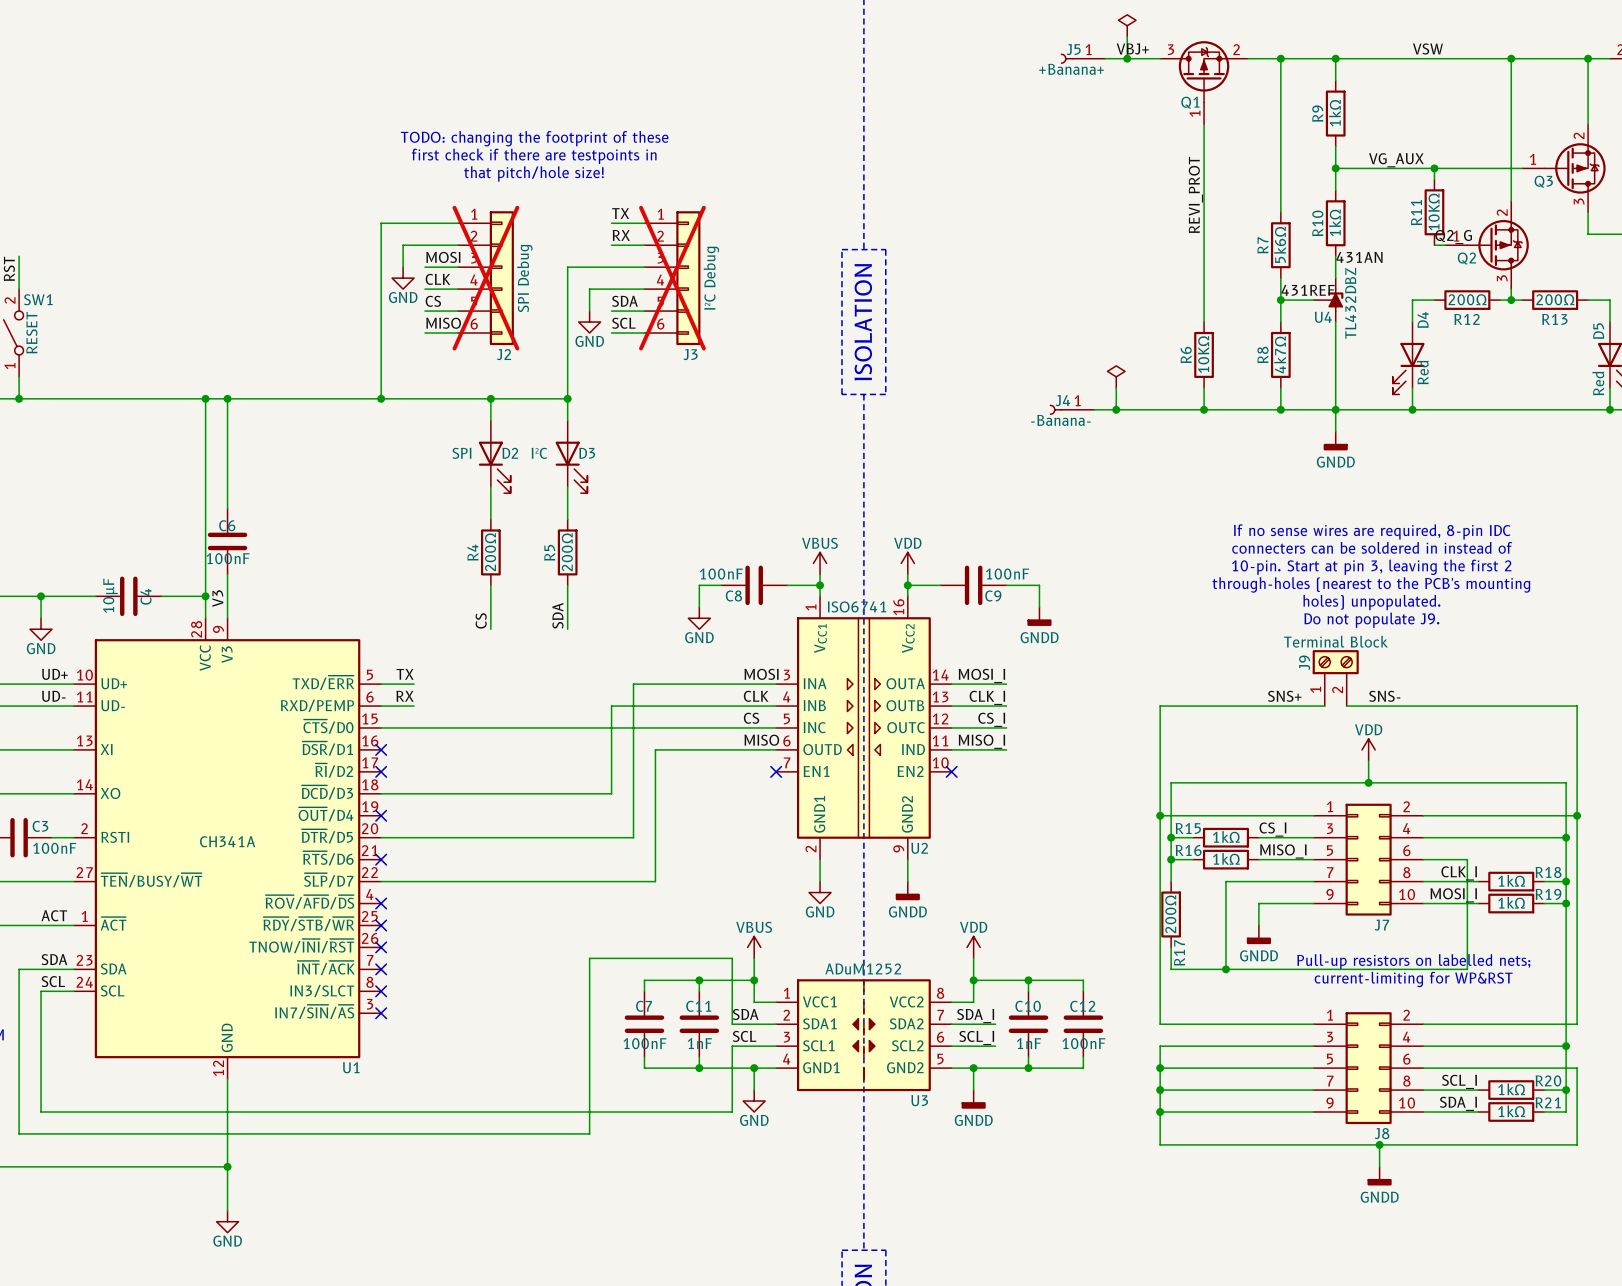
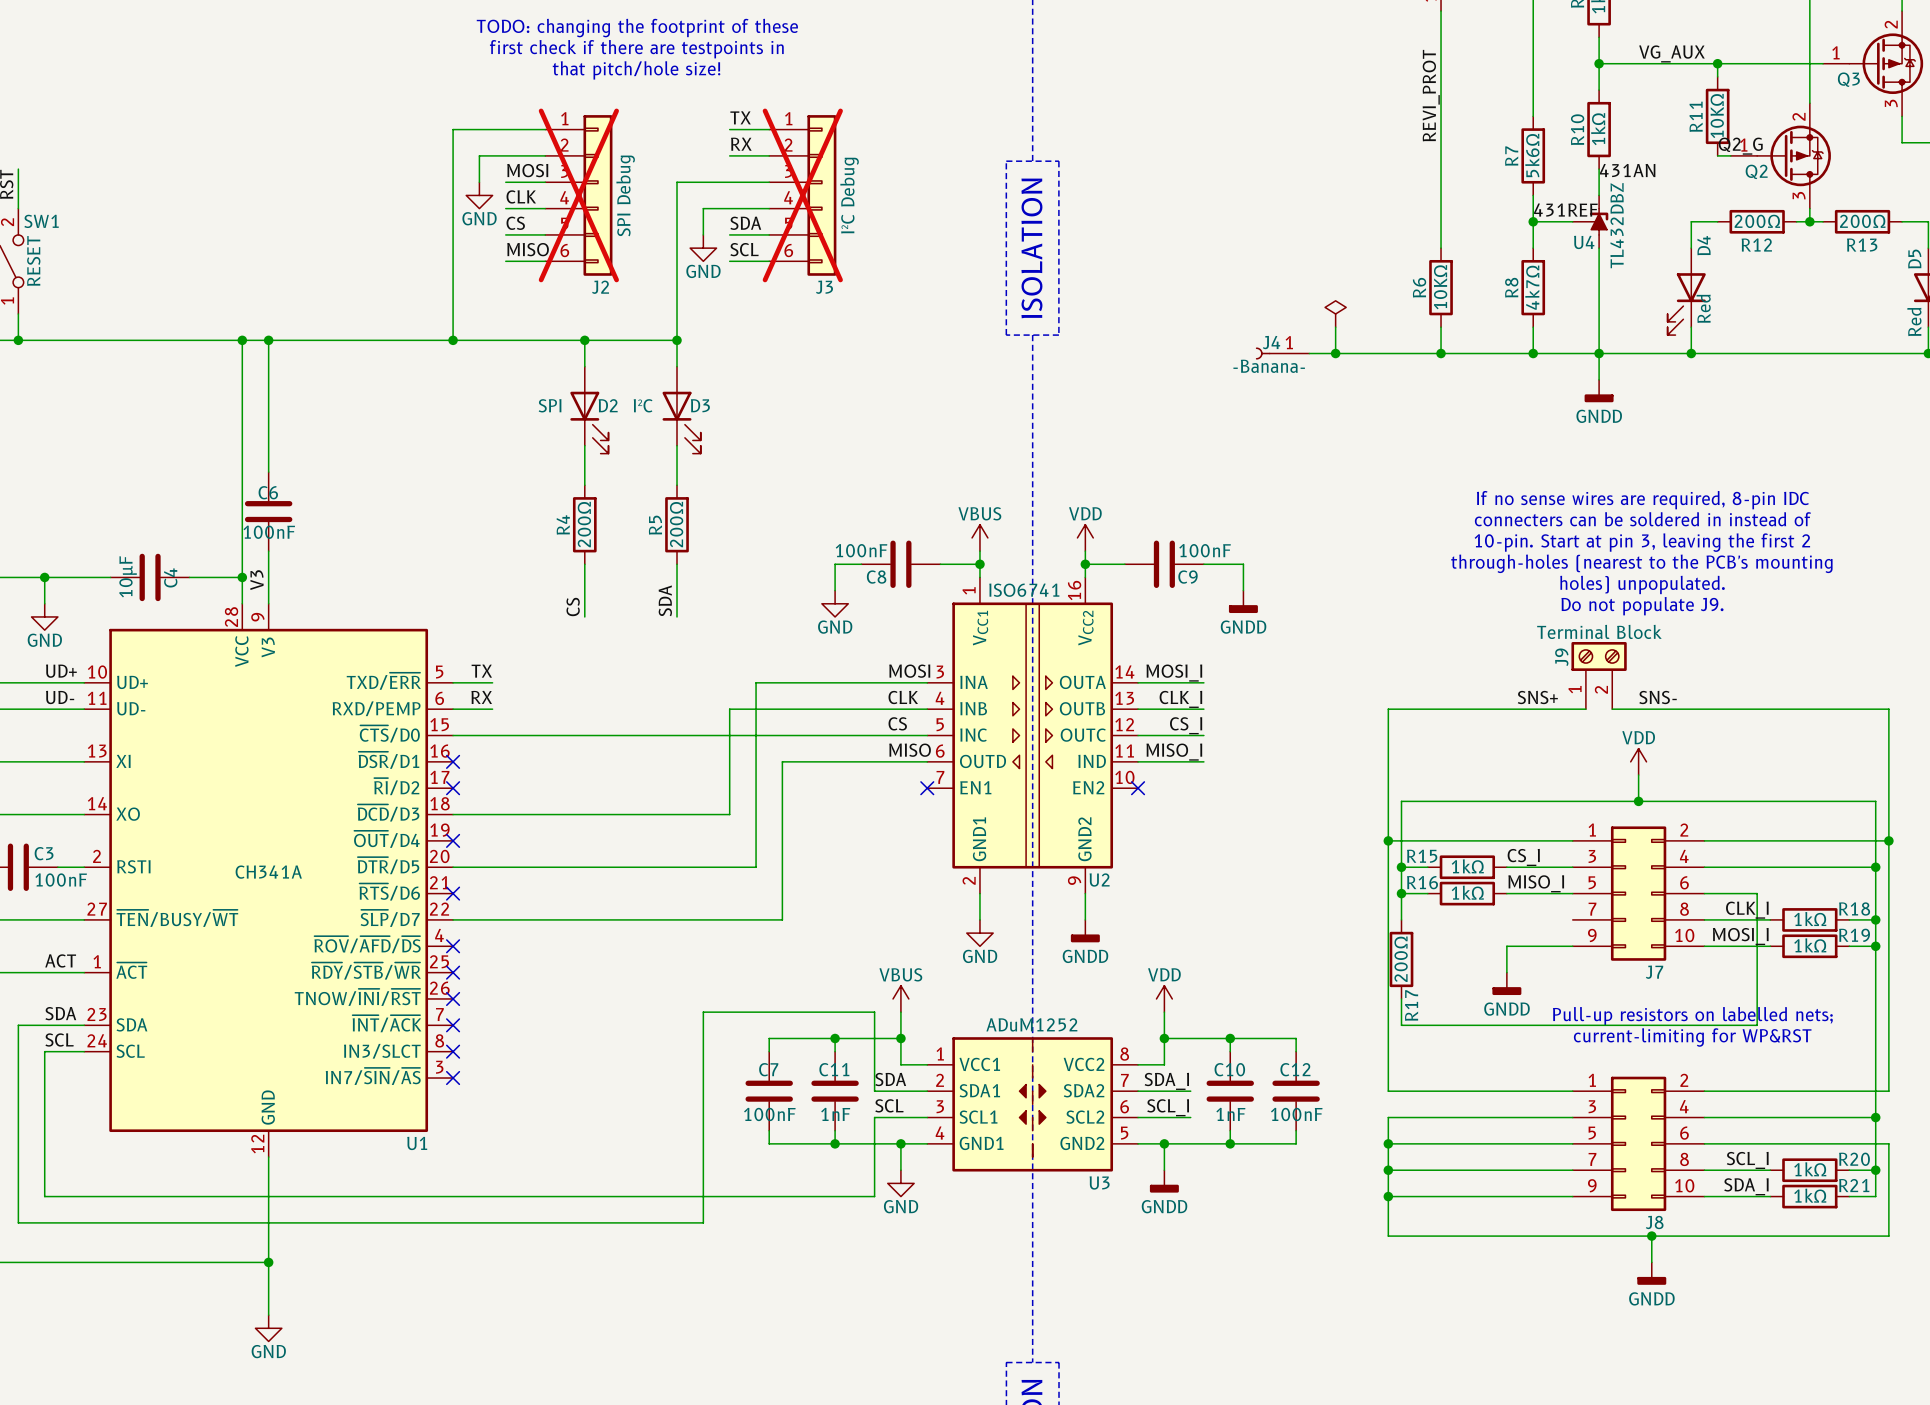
wire: (1313, 881) (1225, 881) (1225, 969) -> none
junction: (1225, 969) -> none

